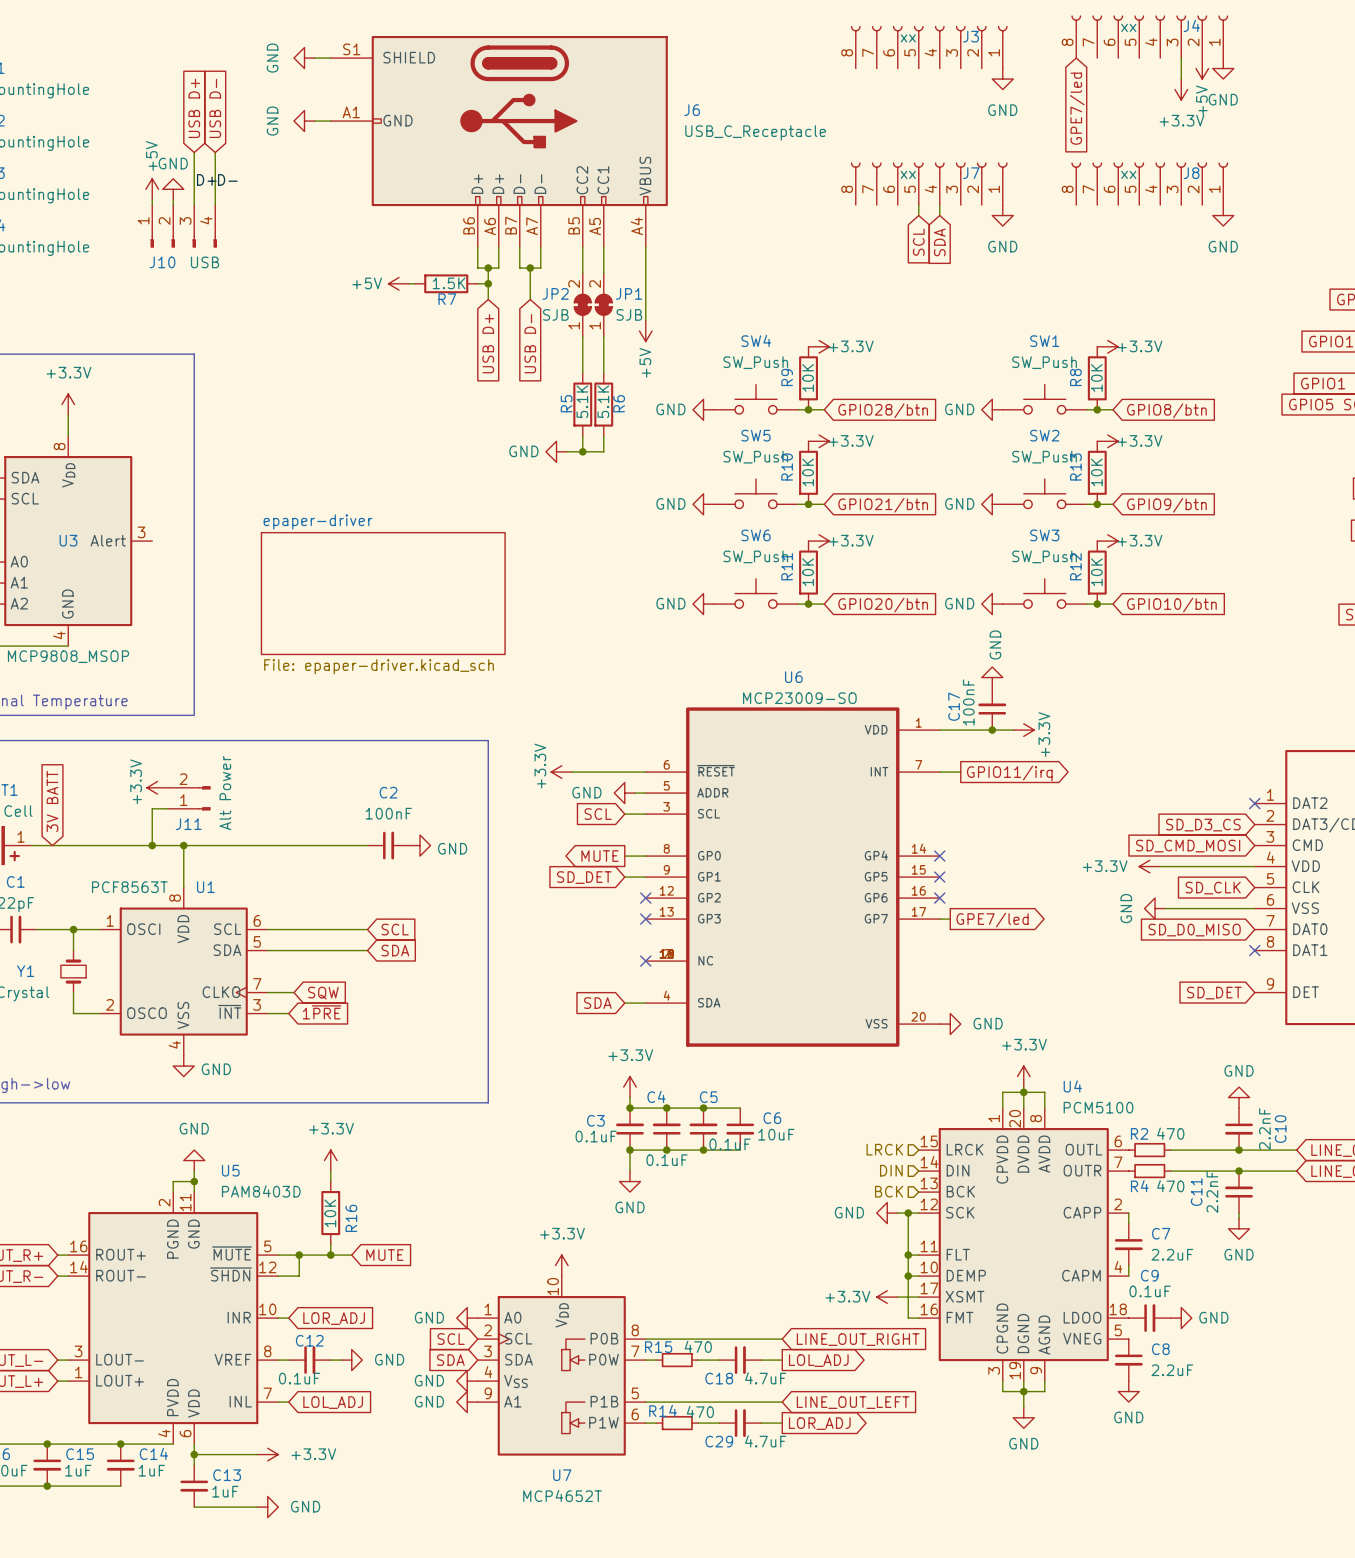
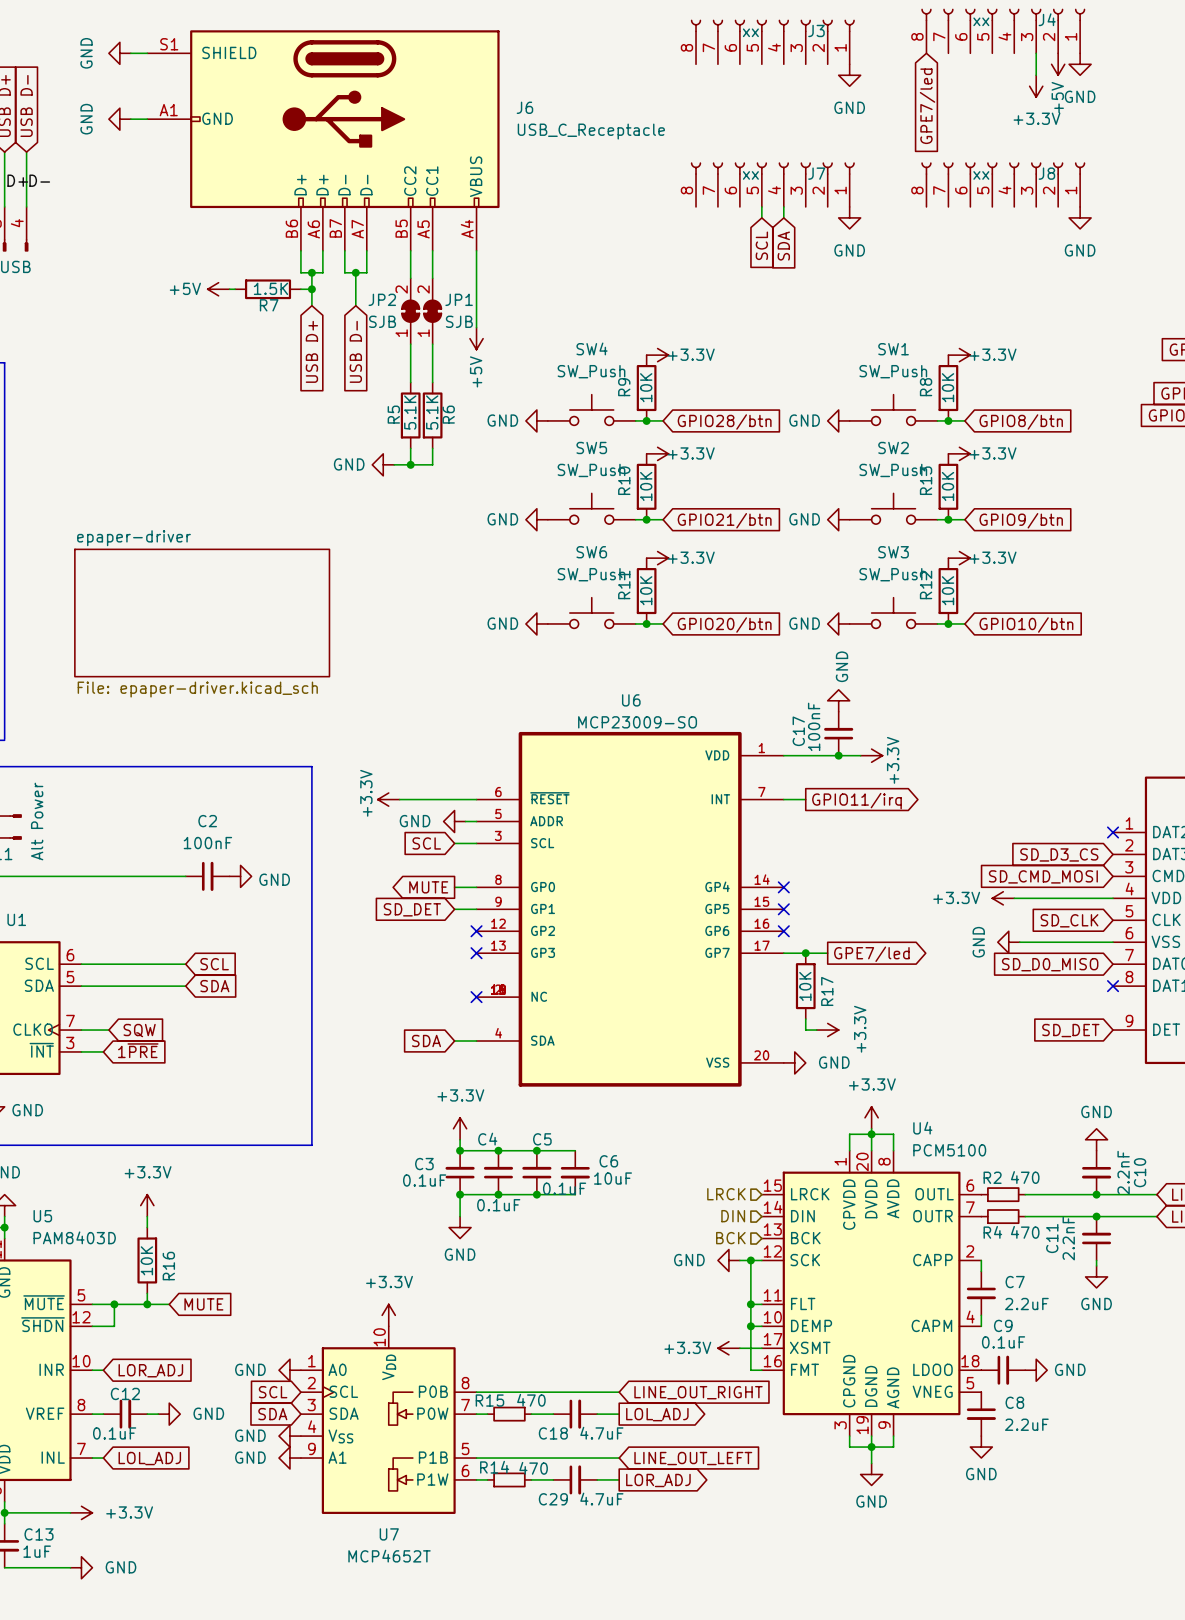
wire: none -> (794, 953) (827, 953)
junction: none -> (805, 953)
global label position: GPE7/led (992, 920) -> GPE7/led (871, 954)
R17: none -> 10K (805, 986)
wire: none -> (805, 1019) (805, 1030) (816, 1030)
power symbol: none -> +3.3V (827, 1030)

